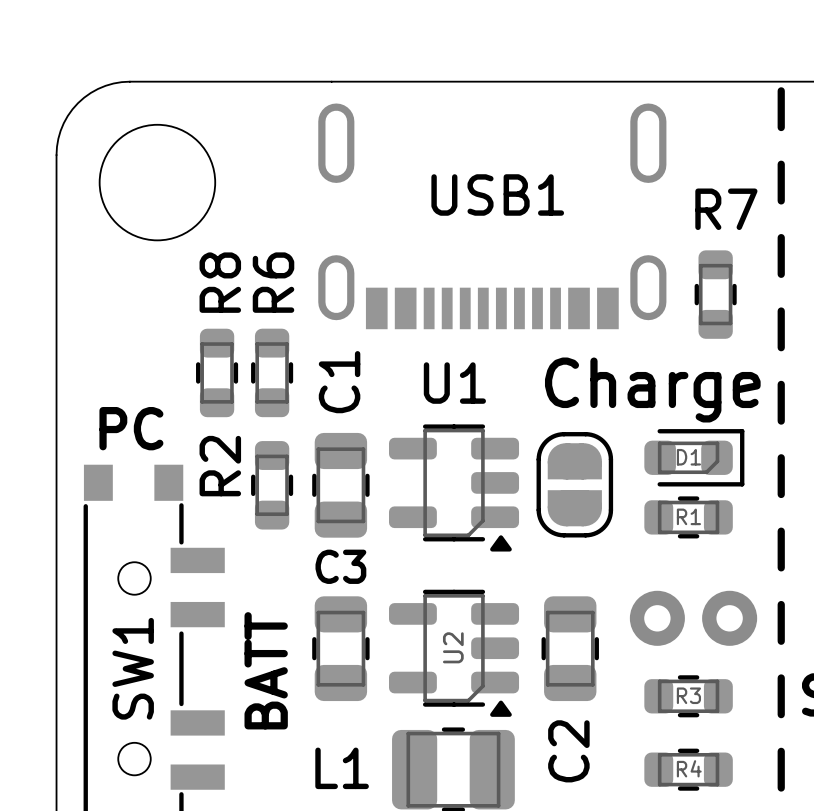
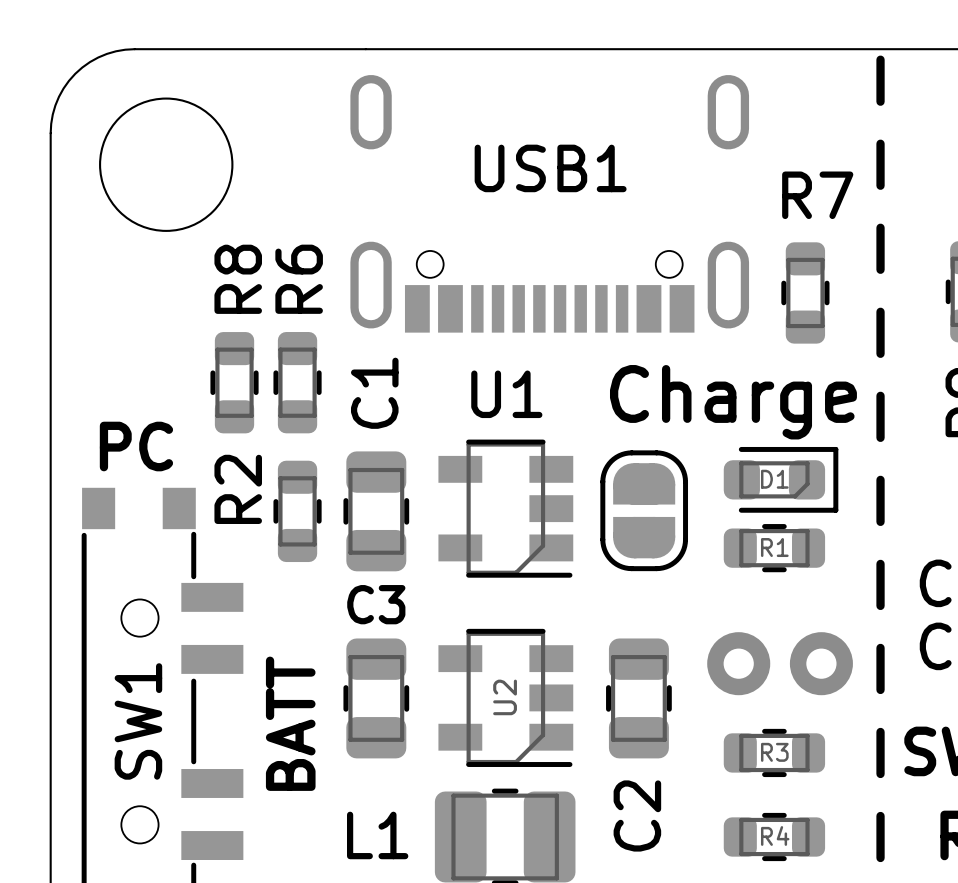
USB1 footprint: [318, 103, 667, 330] -> [350, 74, 750, 333]
U1 footprint: [389, 424, 520, 552] -> [438, 439, 574, 578]
U2 footprint: [389, 589, 520, 717] -> [438, 628, 574, 767]

